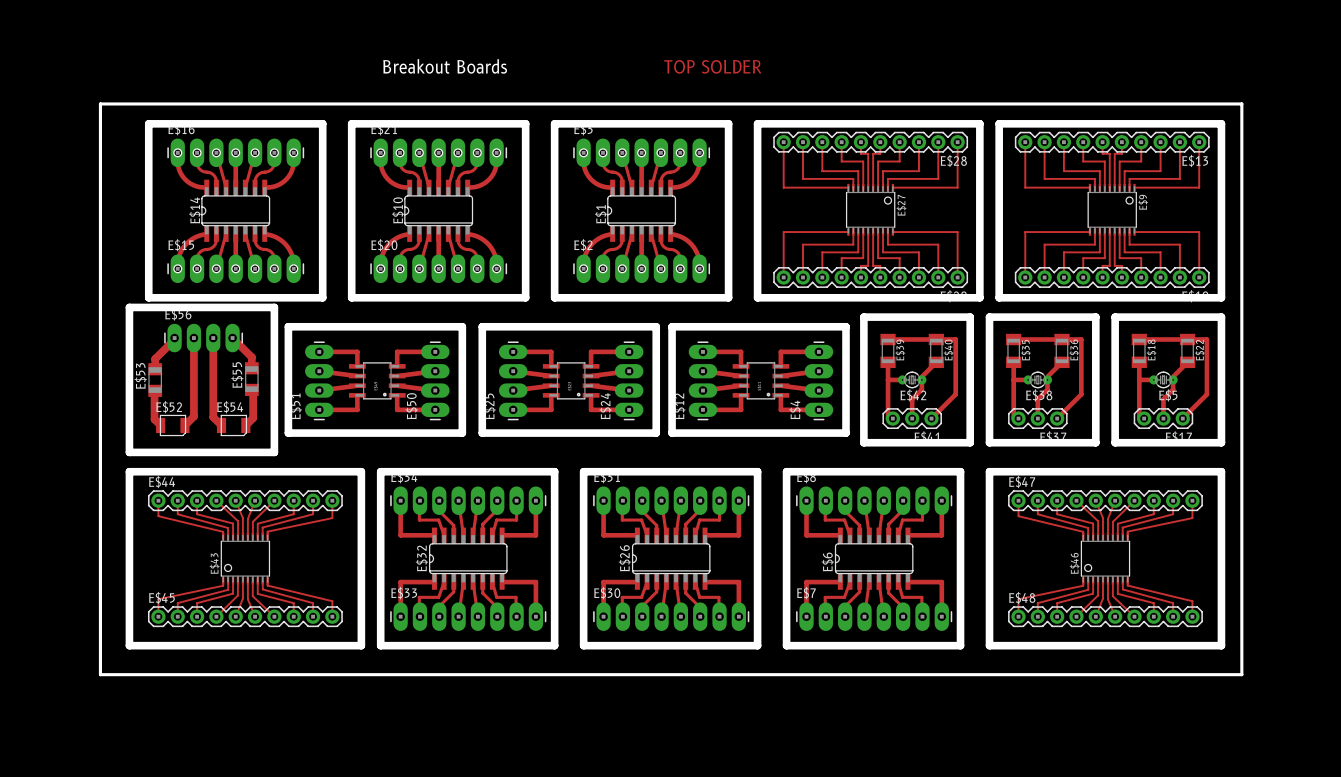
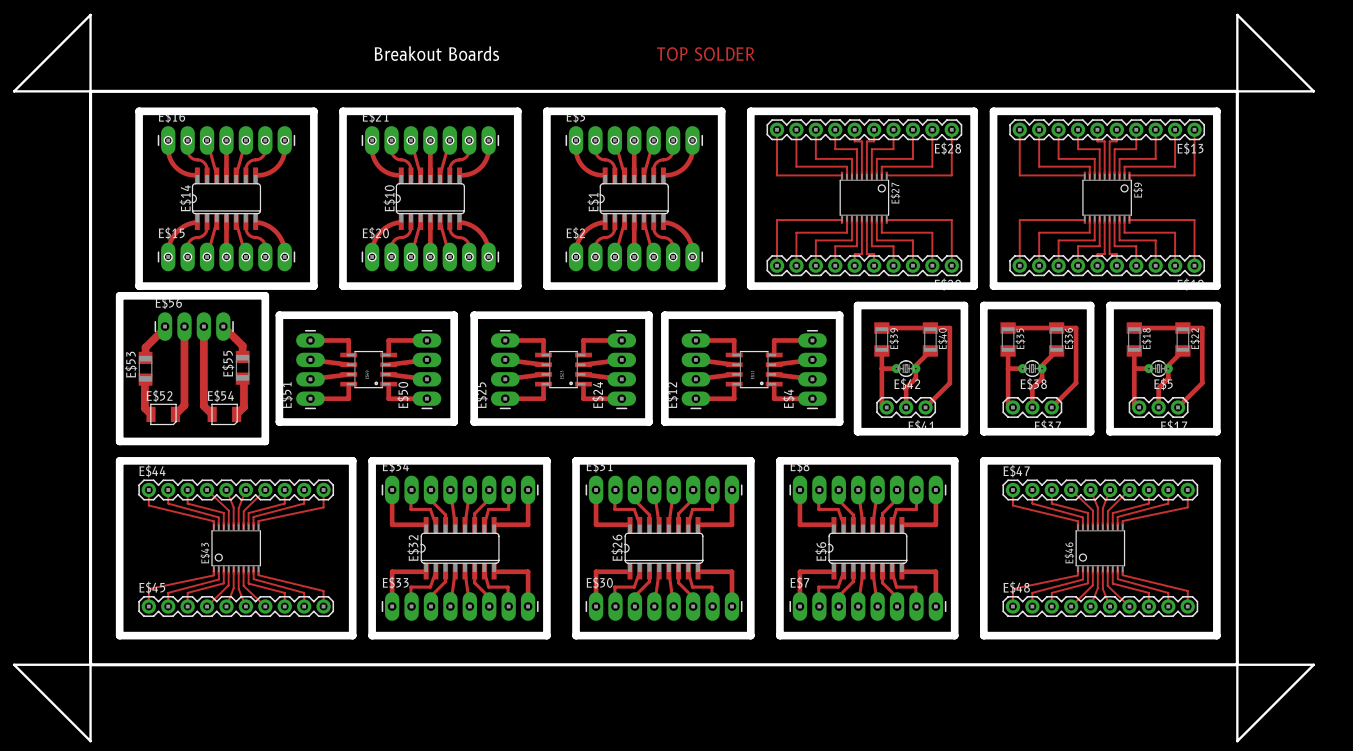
board edge: none -> (90, 14) (90, 91) (14, 91) (90, 14)
board edge: none -> (1237, 14) (1237, 91) (1313, 91) (1237, 14)
board edge: none -> (14, 664) (90, 664) (90, 741) (14, 664)
board edge: none -> (1237, 664) (1313, 664) (1237, 741) (1237, 664)

